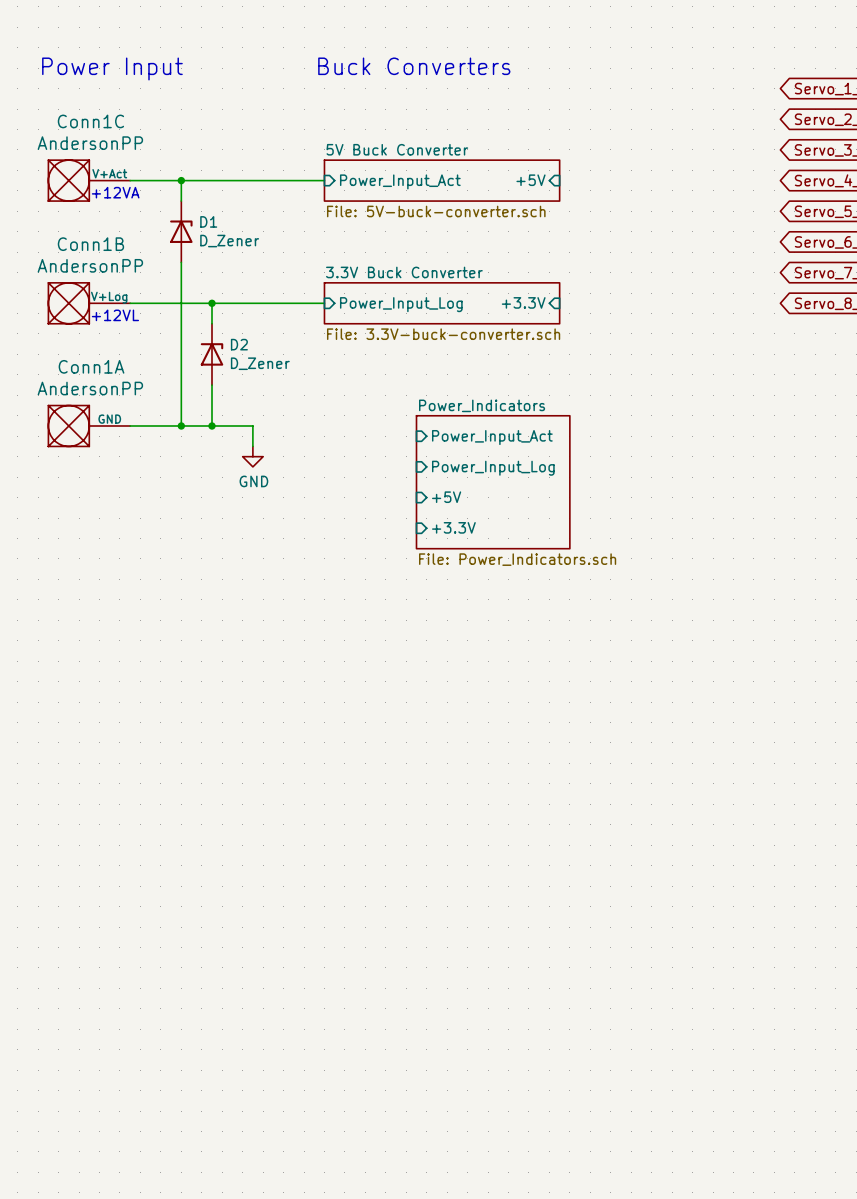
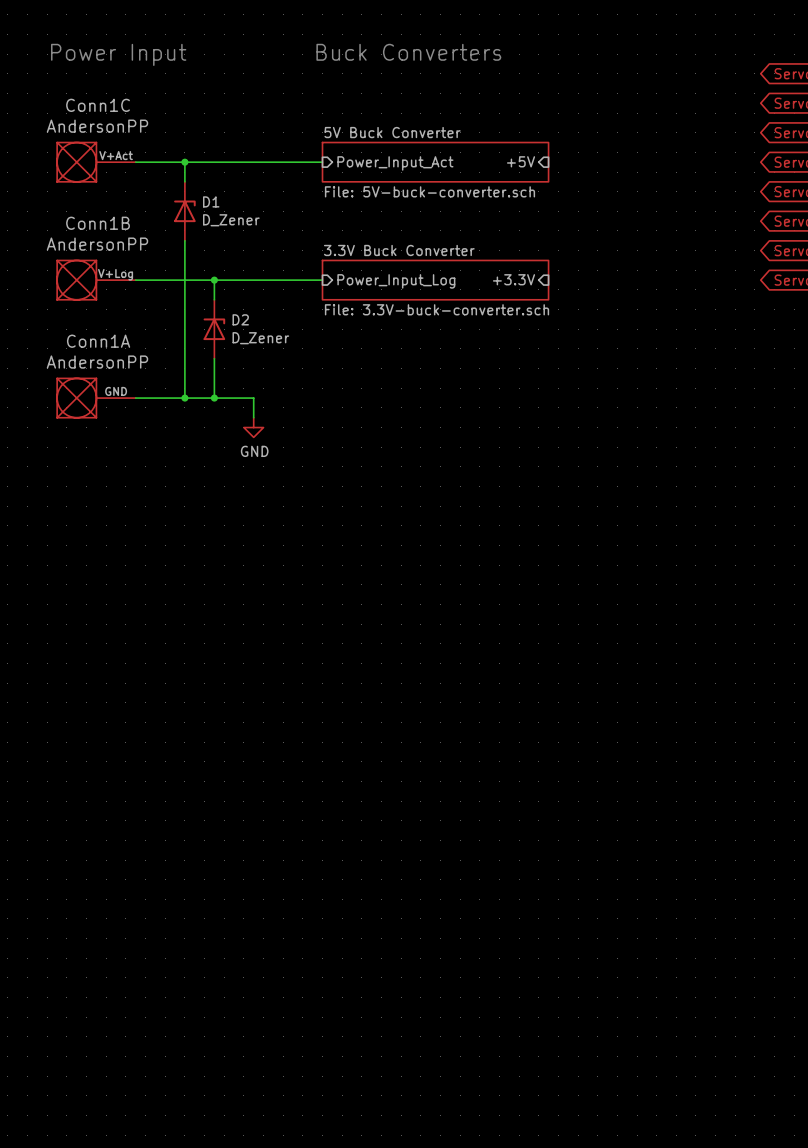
text: +12VA (115, 192) -> none
text: +12VL (115, 315) -> none
sheet pin: Power_Input_Act (492, 437) -> none
sheet pin: Power_Input_Log (493, 468) -> none
sheet Power_Indicators: File: Power_Indicators.sch (493, 482) -> none
sheet pin: +5V (446, 497) -> none
sheet pin: +3.3V (453, 527) -> none

